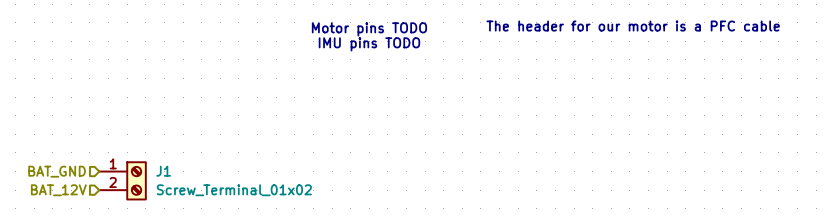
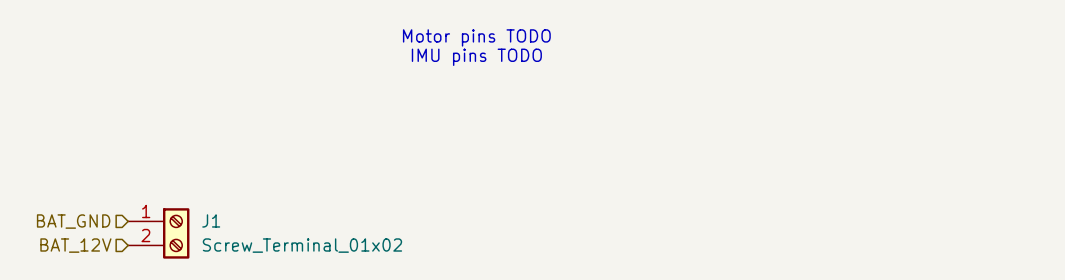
text: The header for our motor is a PFC cable (633, 26) -> none

